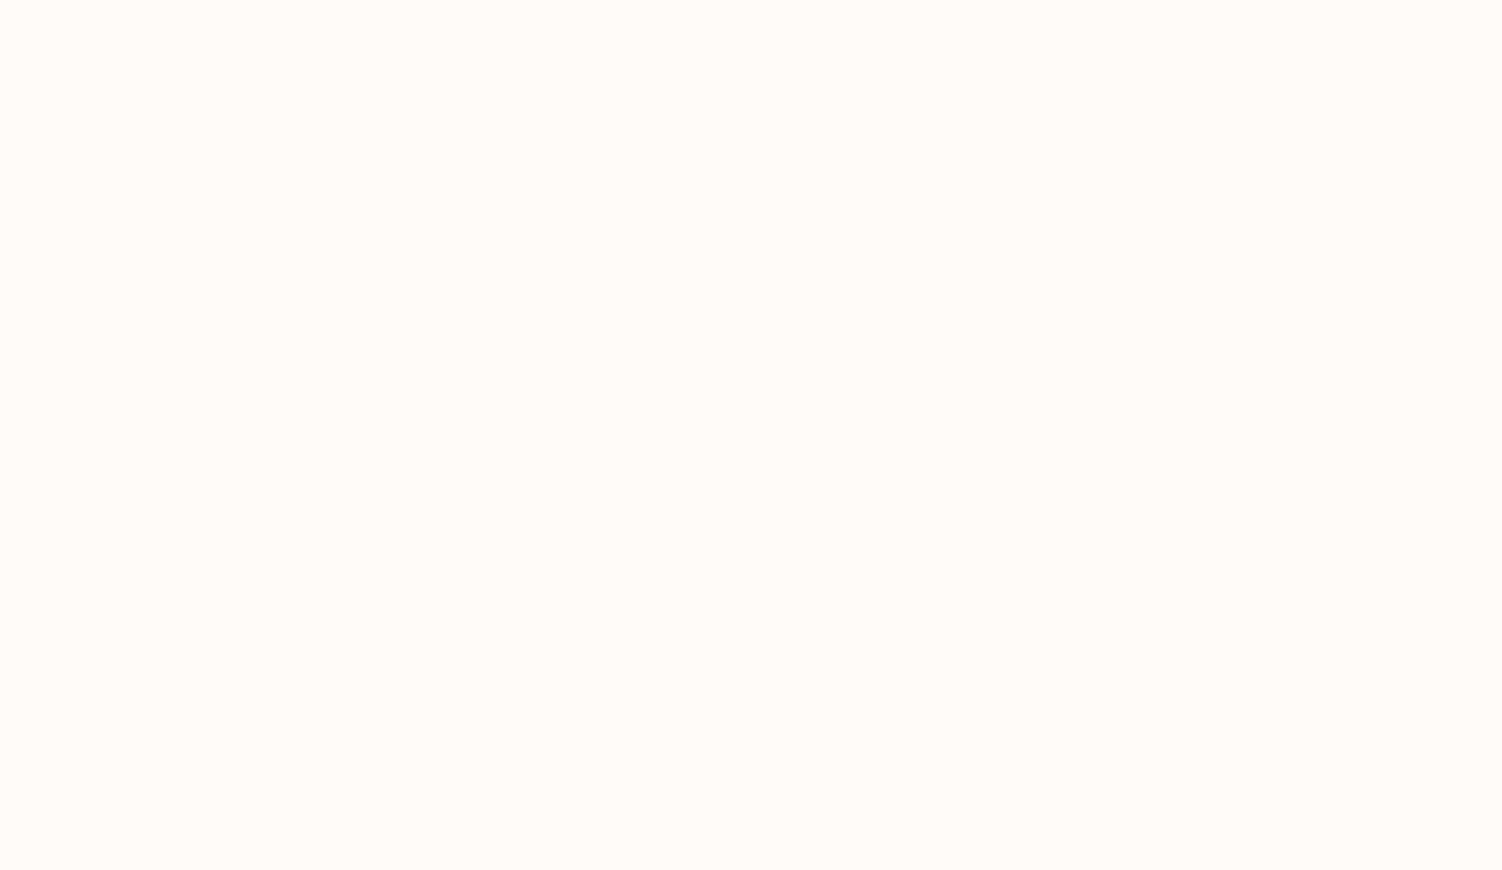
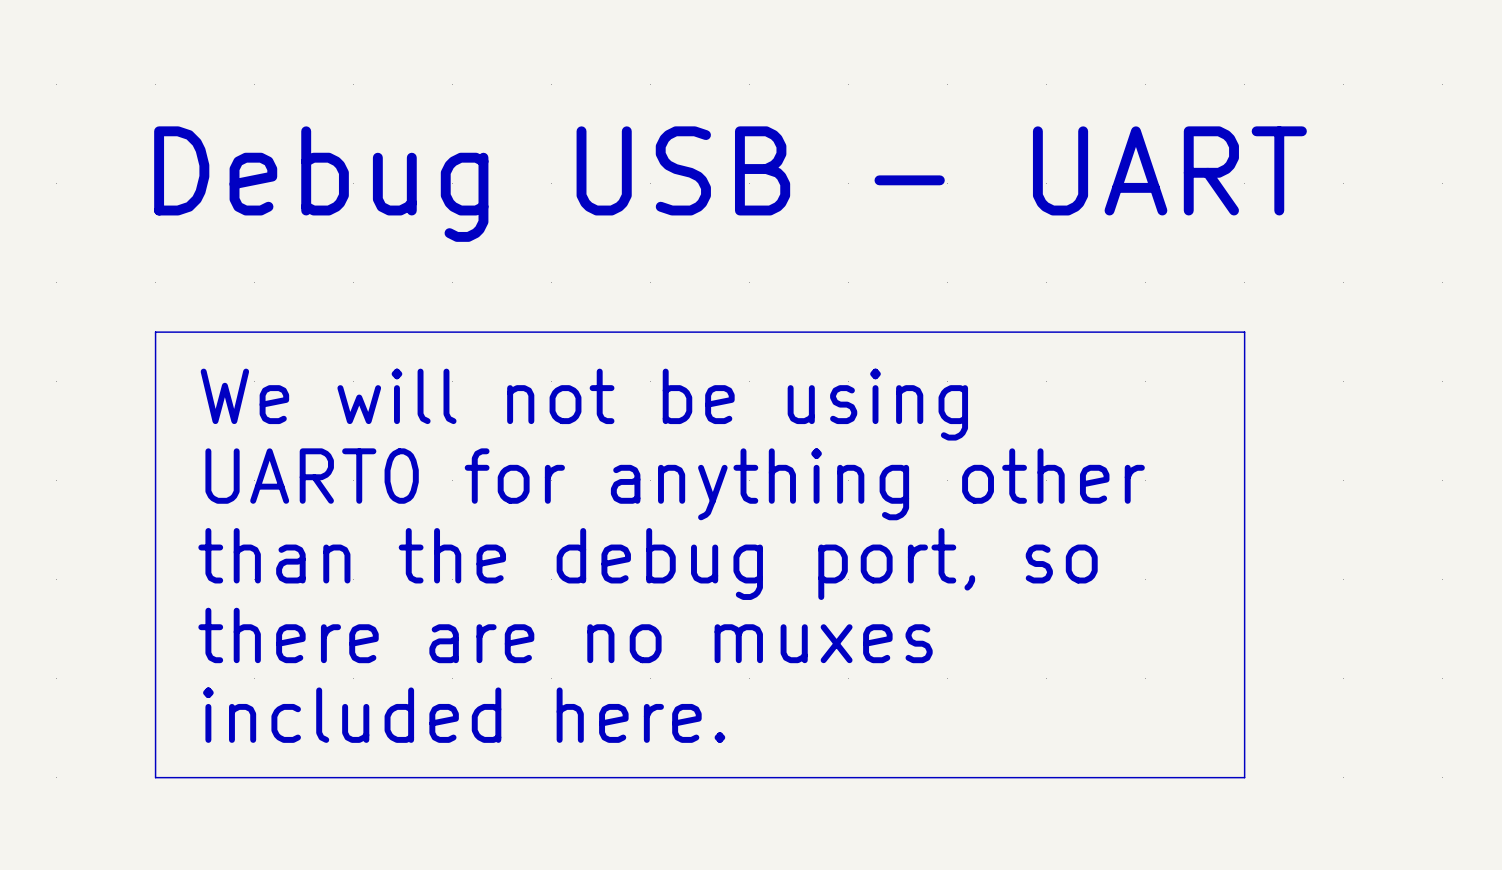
text: none -> Debug USB - UART (730, 184)
line: none -> (155, 332) (1244, 332) (1244, 777) (155, 777) (155, 332)
text: none -> We will not be using (584, 404)
text: none -> UART0 for anything other (675, 484)
text: none -> than the debug port, so (648, 564)
text: none -> there are no muxes (565, 635)
text: none -> included here. (464, 715)

